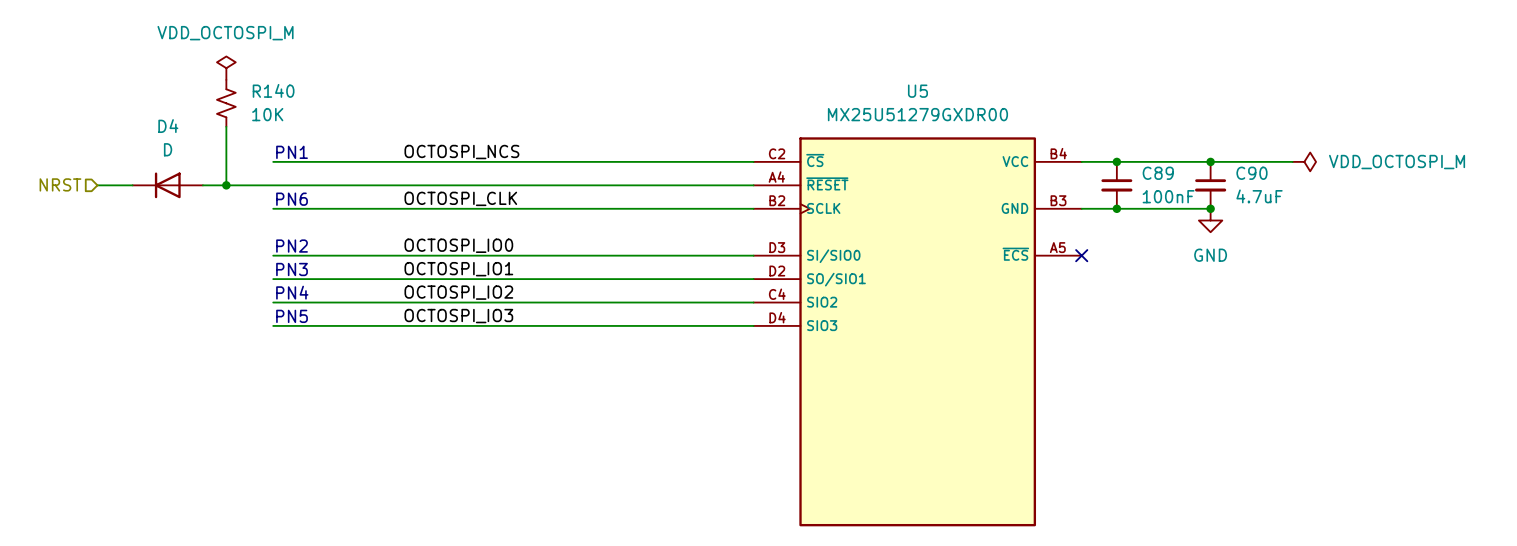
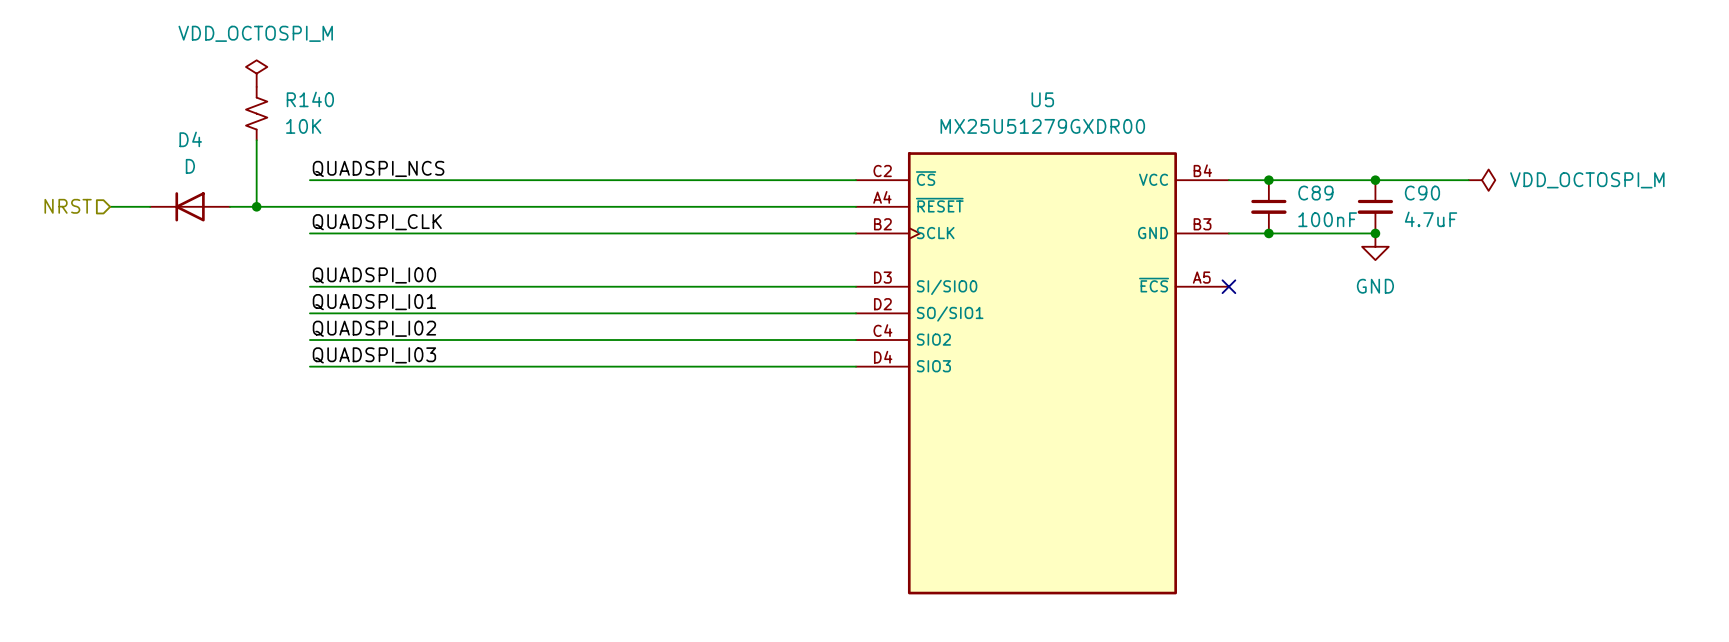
text: PN1 (292, 152) -> none
label: OCTOSPI_NCS (461, 152) -> QUADSPI_NCS (378, 168)
label: OCTOSPI_CLK (460, 198) -> QUADSPI_CLK (377, 222)
text: PN6 (292, 199) -> none
label: none -> QUADSPI_I00 (374, 275)
label: OCTOSPI_IO0 (458, 245) -> none
text: PN2 (292, 246) -> none
text: PN3 (292, 269) -> none
label: none -> QUADSPI_I01 (374, 302)
label: OCTOSPI_IO1 (458, 269) -> none
text: PN4 (292, 292) -> none
label: none -> QUADSPI_I02 (374, 328)
label: OCTOSPI_IO2 (458, 292) -> none
text: PN5 (292, 316) -> none
label: none -> QUADSPI_I03 (374, 355)
label: OCTOSPI_IO3 (458, 316) -> none

